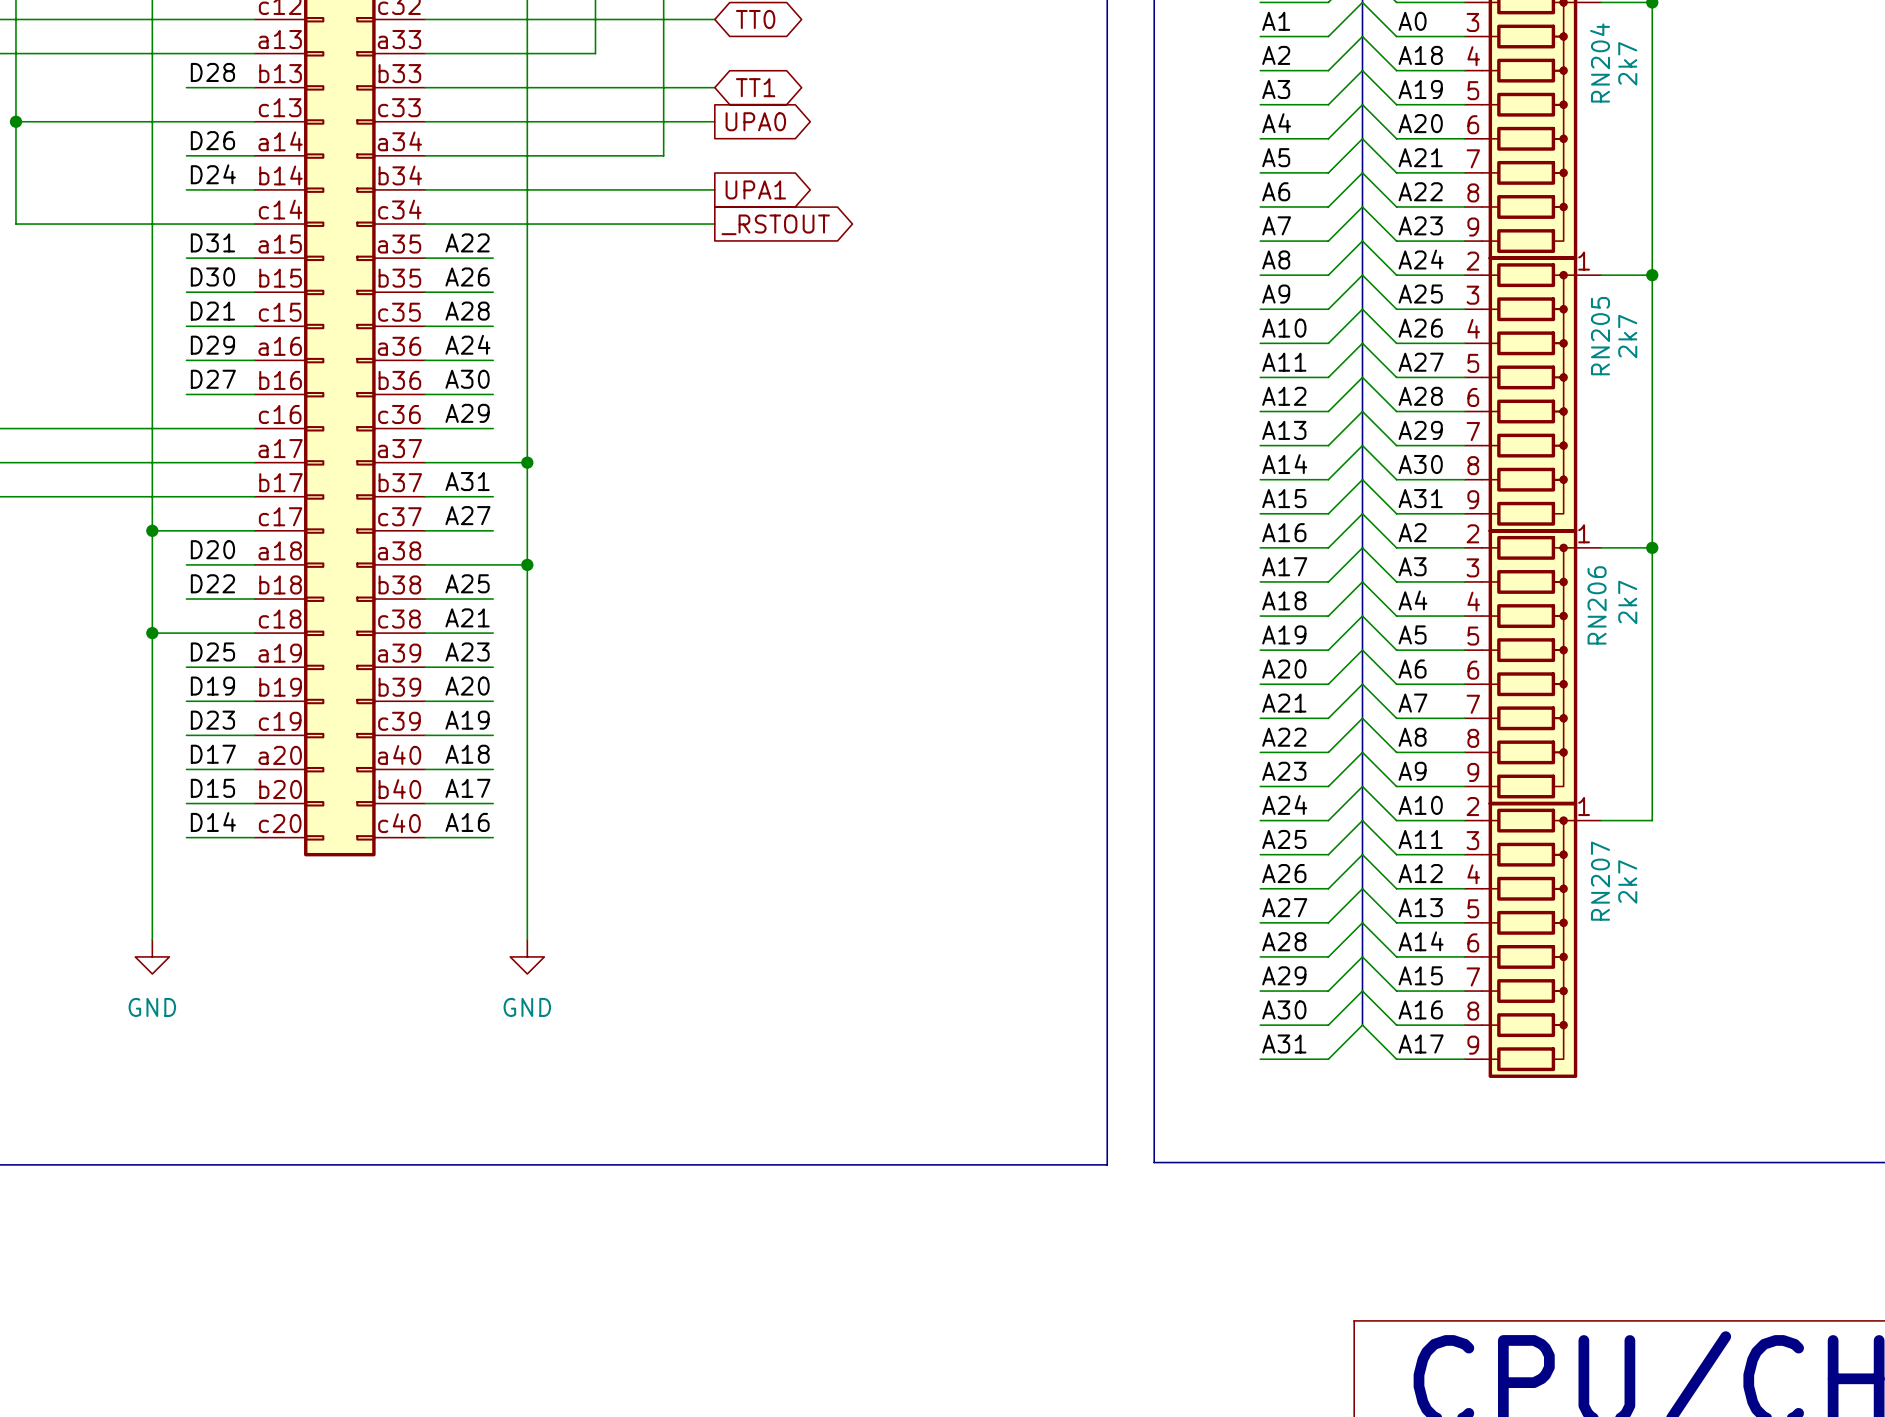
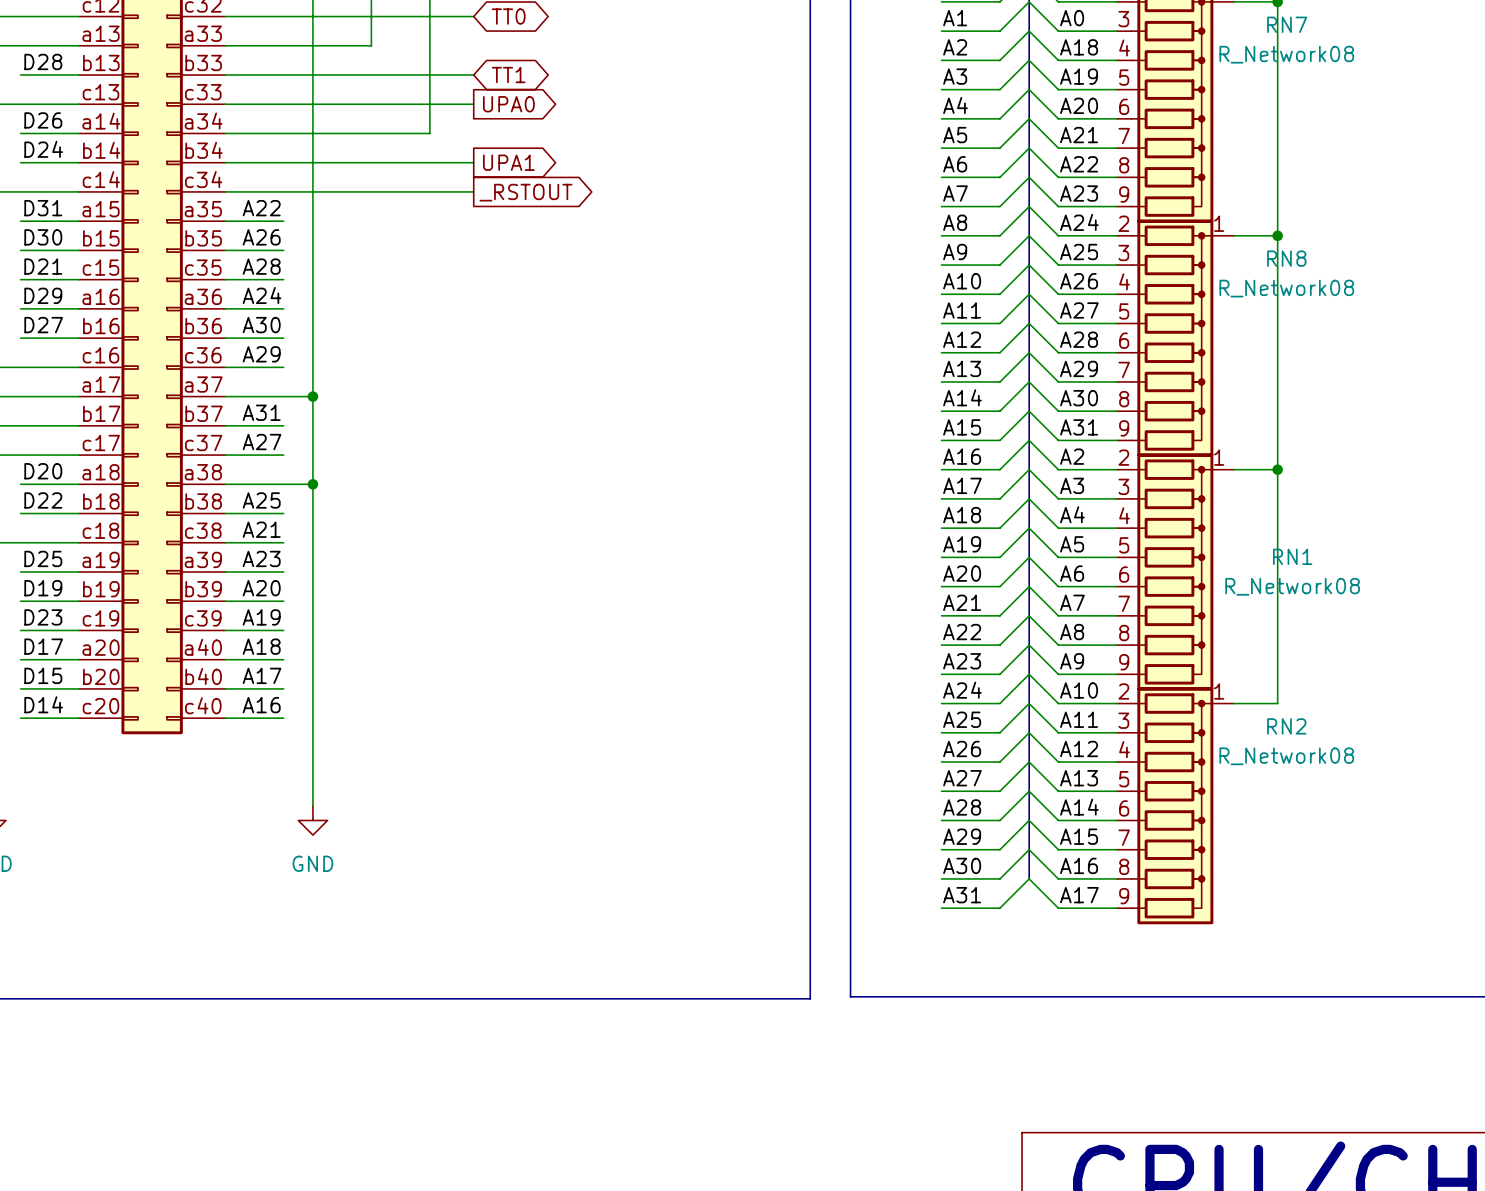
RN204 name: RN204 (1600, 62) -> RN7 (1287, 24)
RN204 value: 2k7 (1627, 63) -> R_Network08 (1286, 54)
RN205 name: RN205 (1600, 336) -> RN8 (1286, 258)
RN205 value: 2k7 (1627, 336) -> R_Network08 (1286, 288)
RN206 value: 2k7 (1627, 602) -> R_Network08 (1292, 586)
RN206 name: RN206 (1597, 605) -> RN1 (1292, 556)
RN207 name: RN207 (1600, 881) -> RN2 (1286, 726)
RN207 value: 2k7 (1627, 881) -> R_Network08 (1286, 756)

